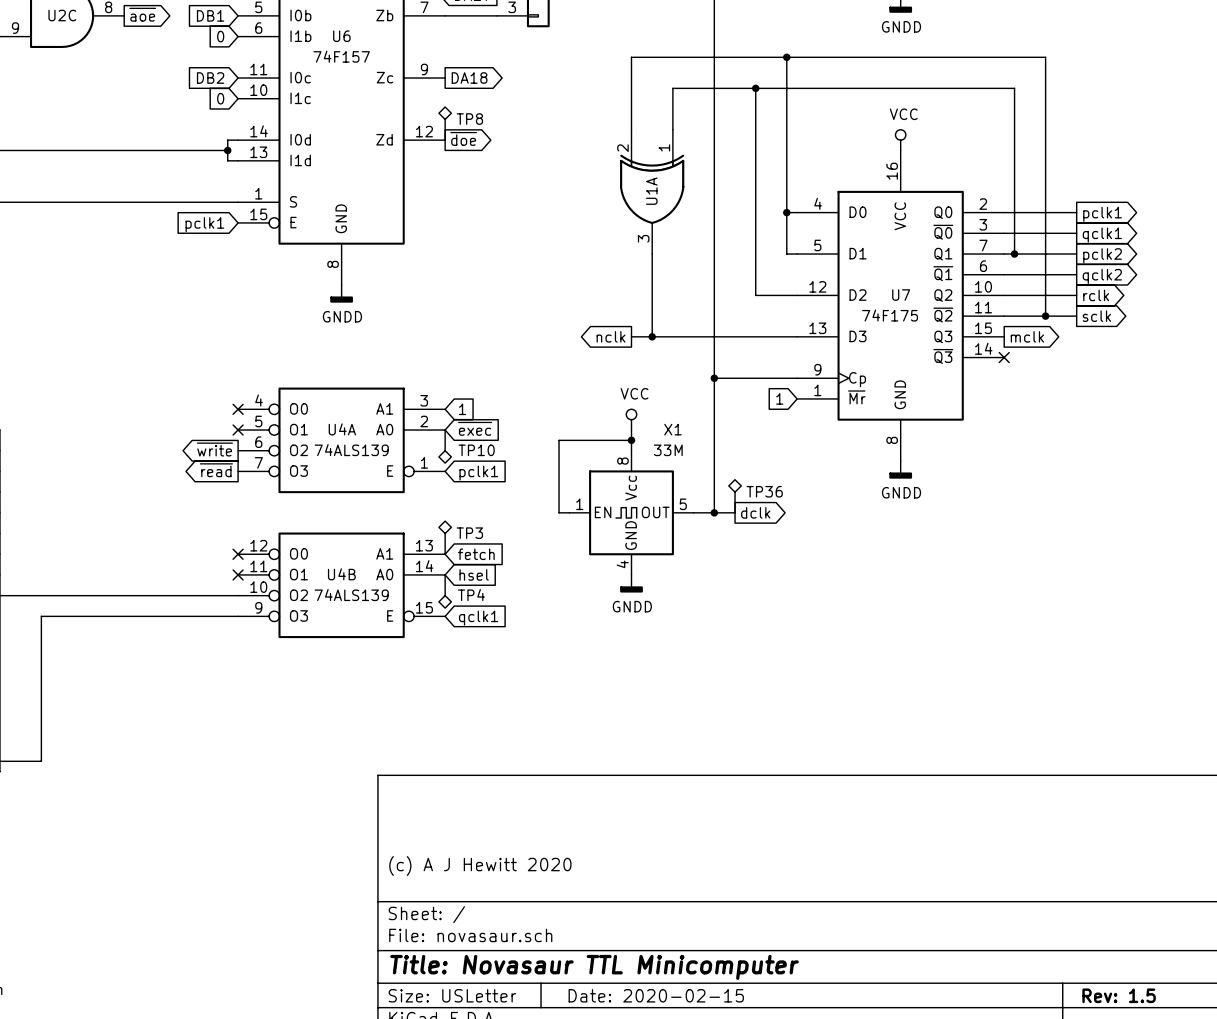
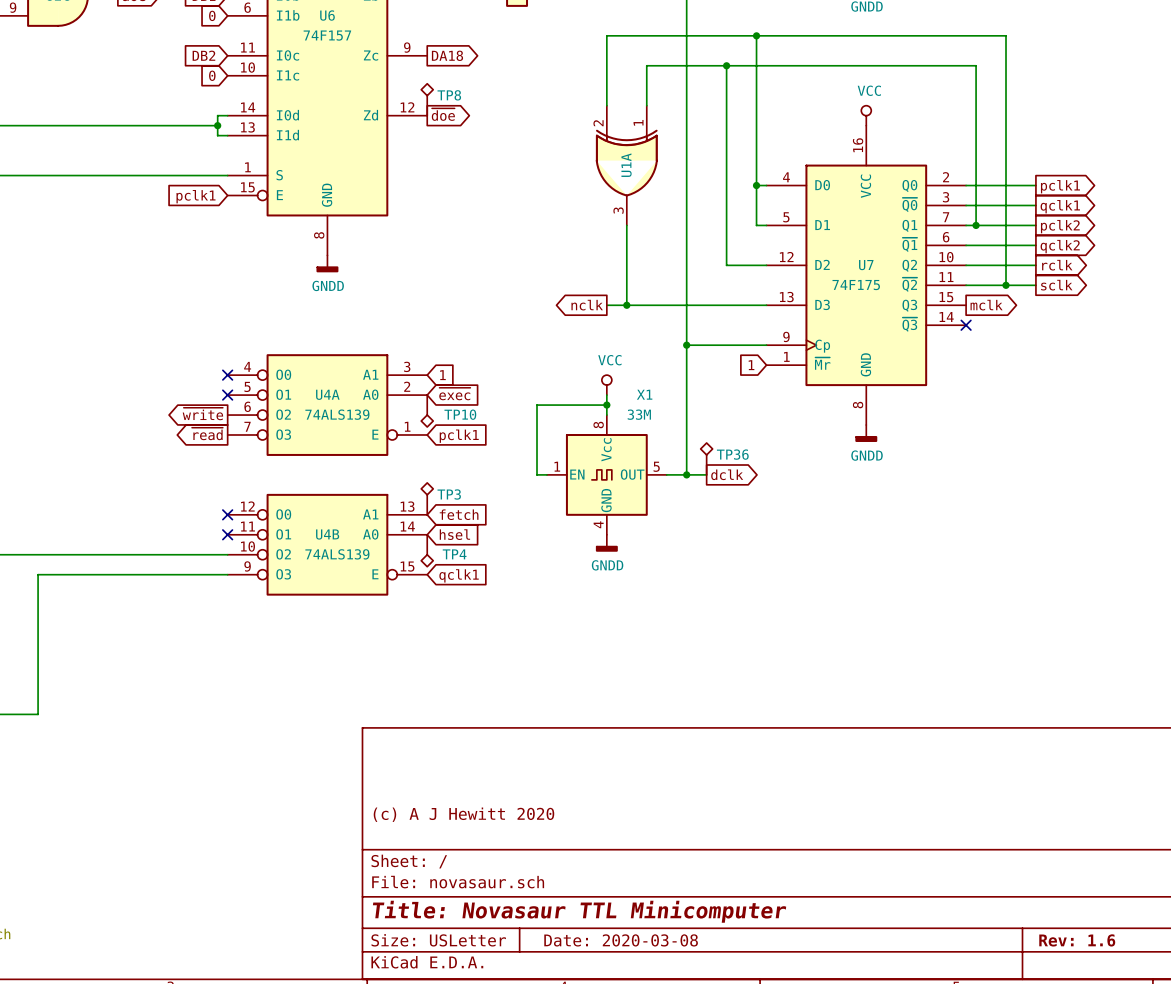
title block: Date: 2020-02-15 (656, 995) -> Date: 2020-03-08 (621, 940)
title block: Rev: 1.5 (1119, 995) -> Rev: 1.6 (1077, 940)

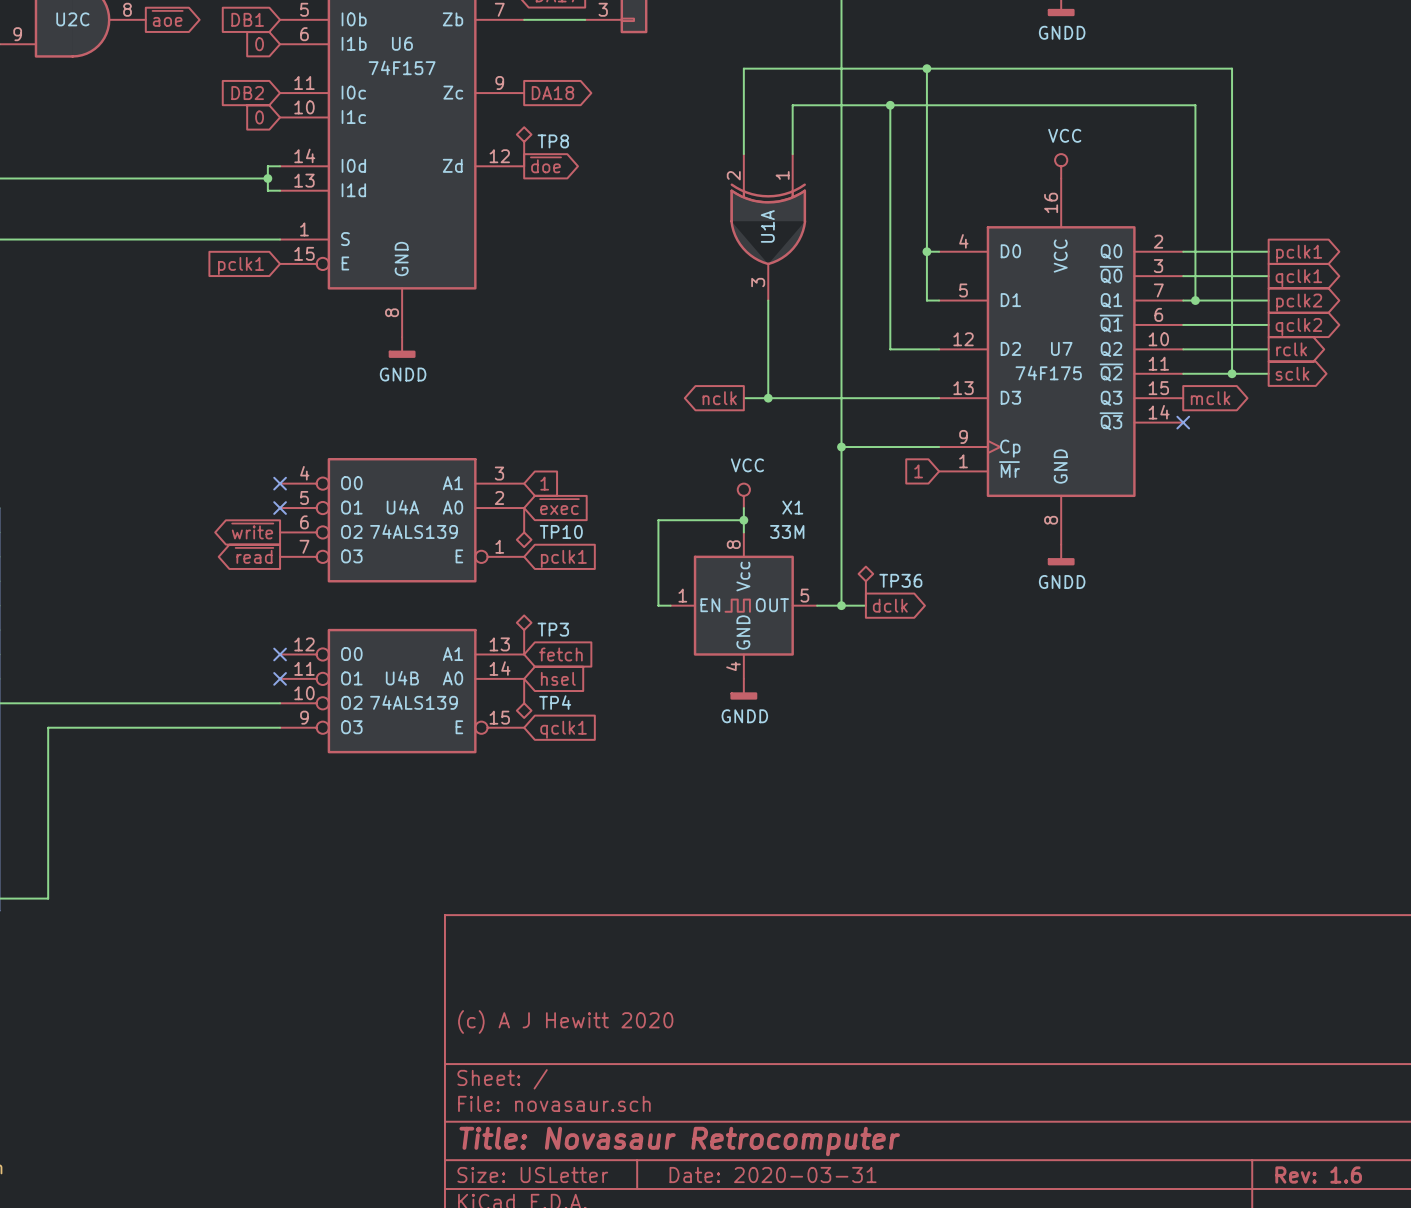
title block: Title: Novasaur TTL Minicomputer (579, 911) -> Title: Novasaur Retrocomputer (679, 1141)
title block: Date: 2020-03-08 (621, 940) -> Date: 2020-03-31 (773, 1175)

